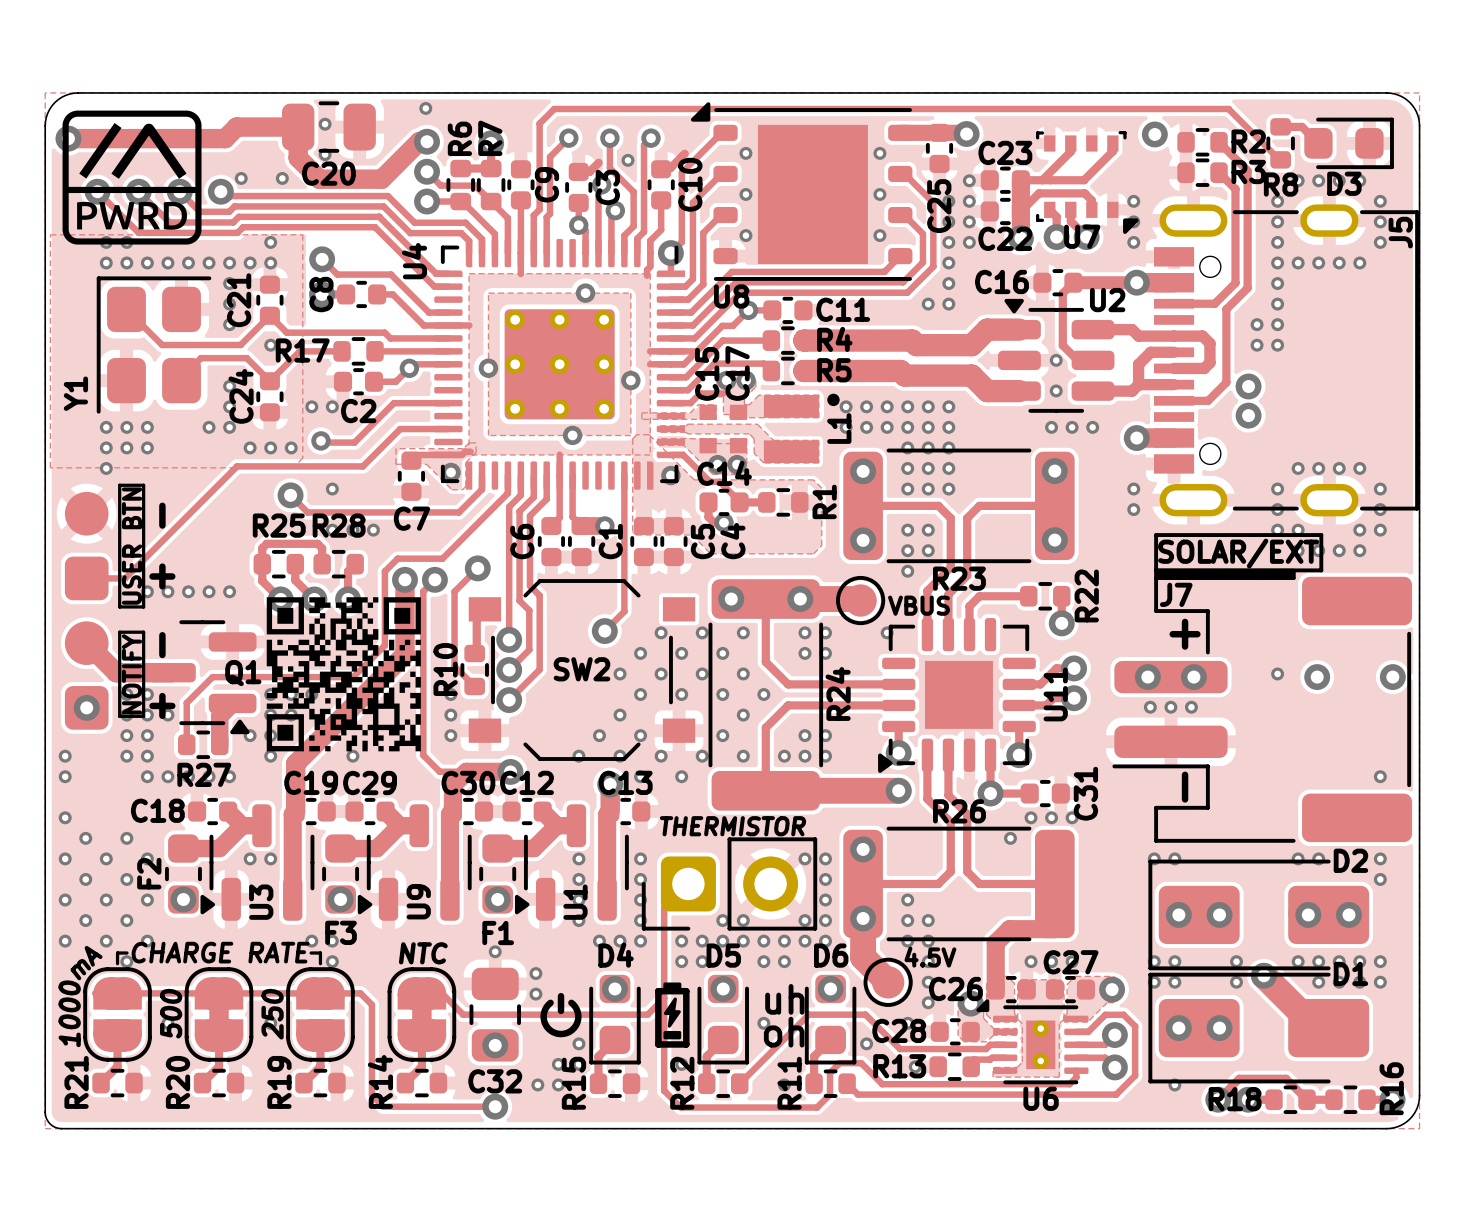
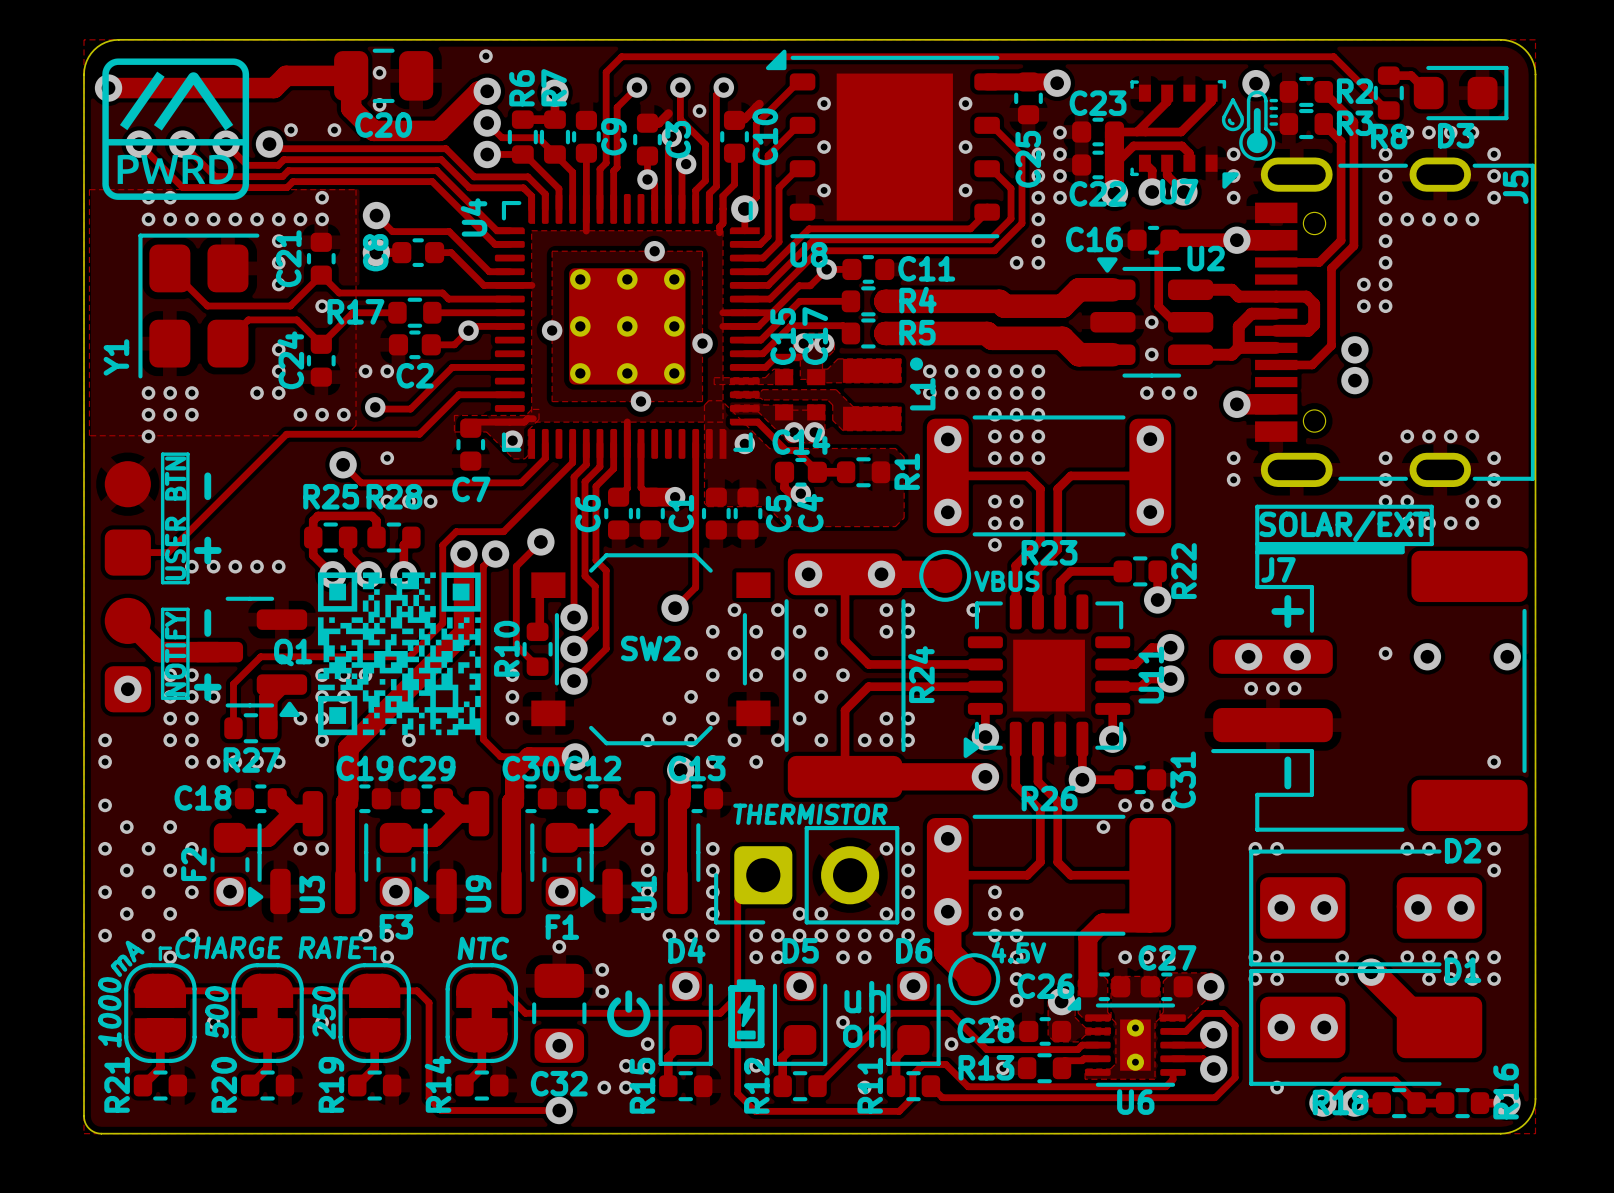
line: none -> (1232, 99) (1223, 120) (1226, 126) (1232, 129) (1239, 126) (1242, 120) (1232, 99)
line: none -> (1248, 101) (1248, 128) (1241, 136) (1241, 147) (1249, 156) (1261, 158) (1270, 152) (1273, 143) (1271, 134) (1265, 128) (1265, 98) (1262, 93) (1256, 92) (1250, 95) (1248, 101)
line: none -> (1271, 100) (1276, 100)
line: none -> (1271, 108) (1276, 108)
line: none -> (1257, 111) (1257, 142)
line: none -> (1271, 116) (1276, 116)
line: none -> (1229, 120) (1232, 123)
line: none -> (1271, 124) (1276, 124)
drawing: none -> [1246, 132, 1268, 154]

